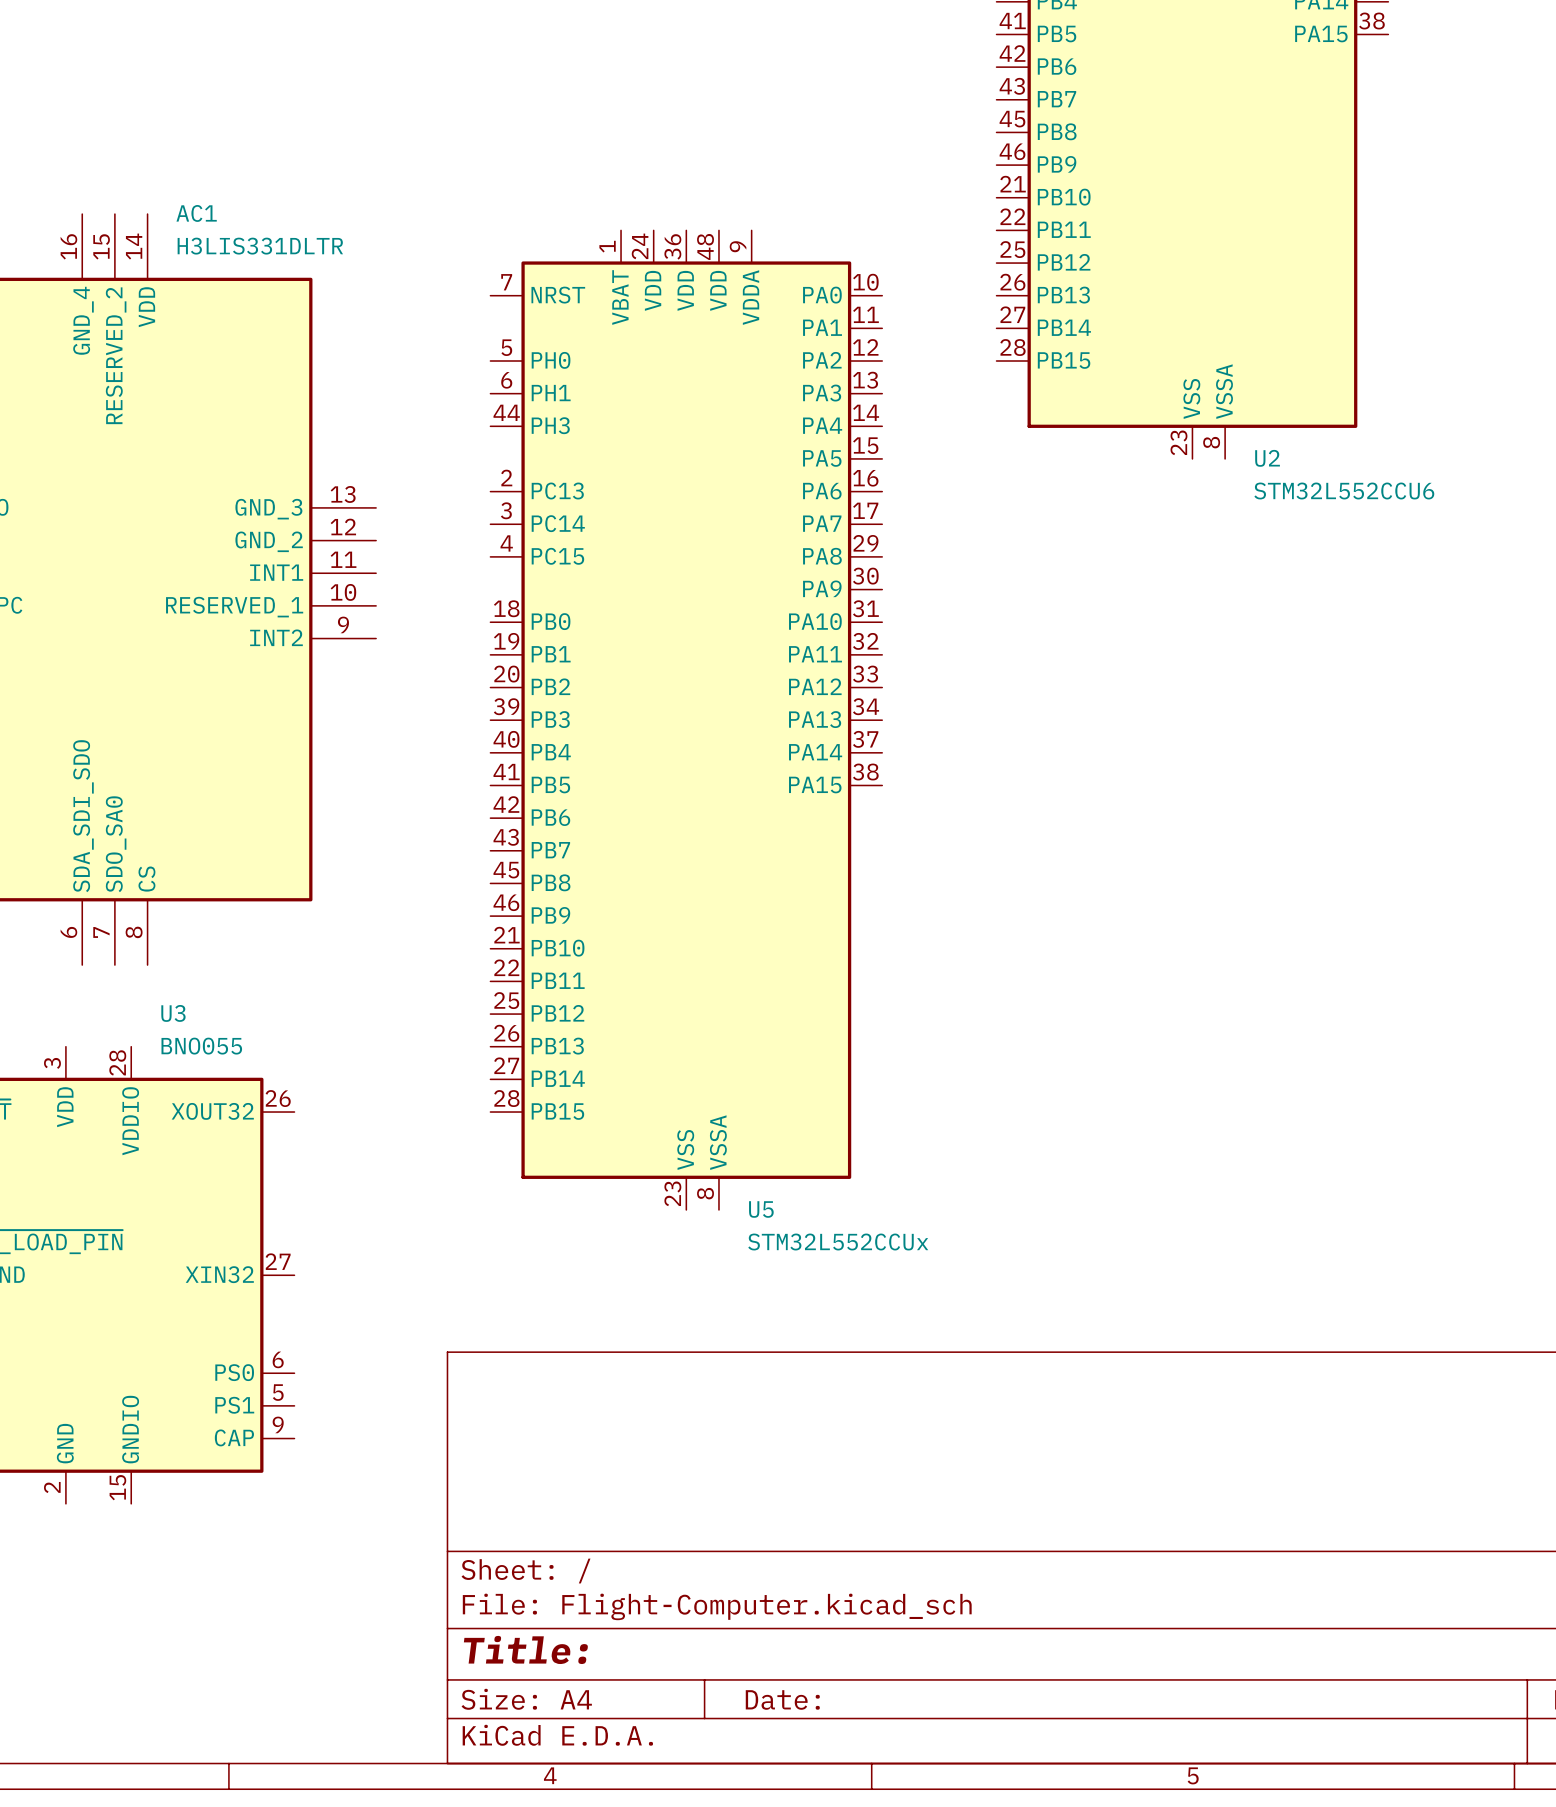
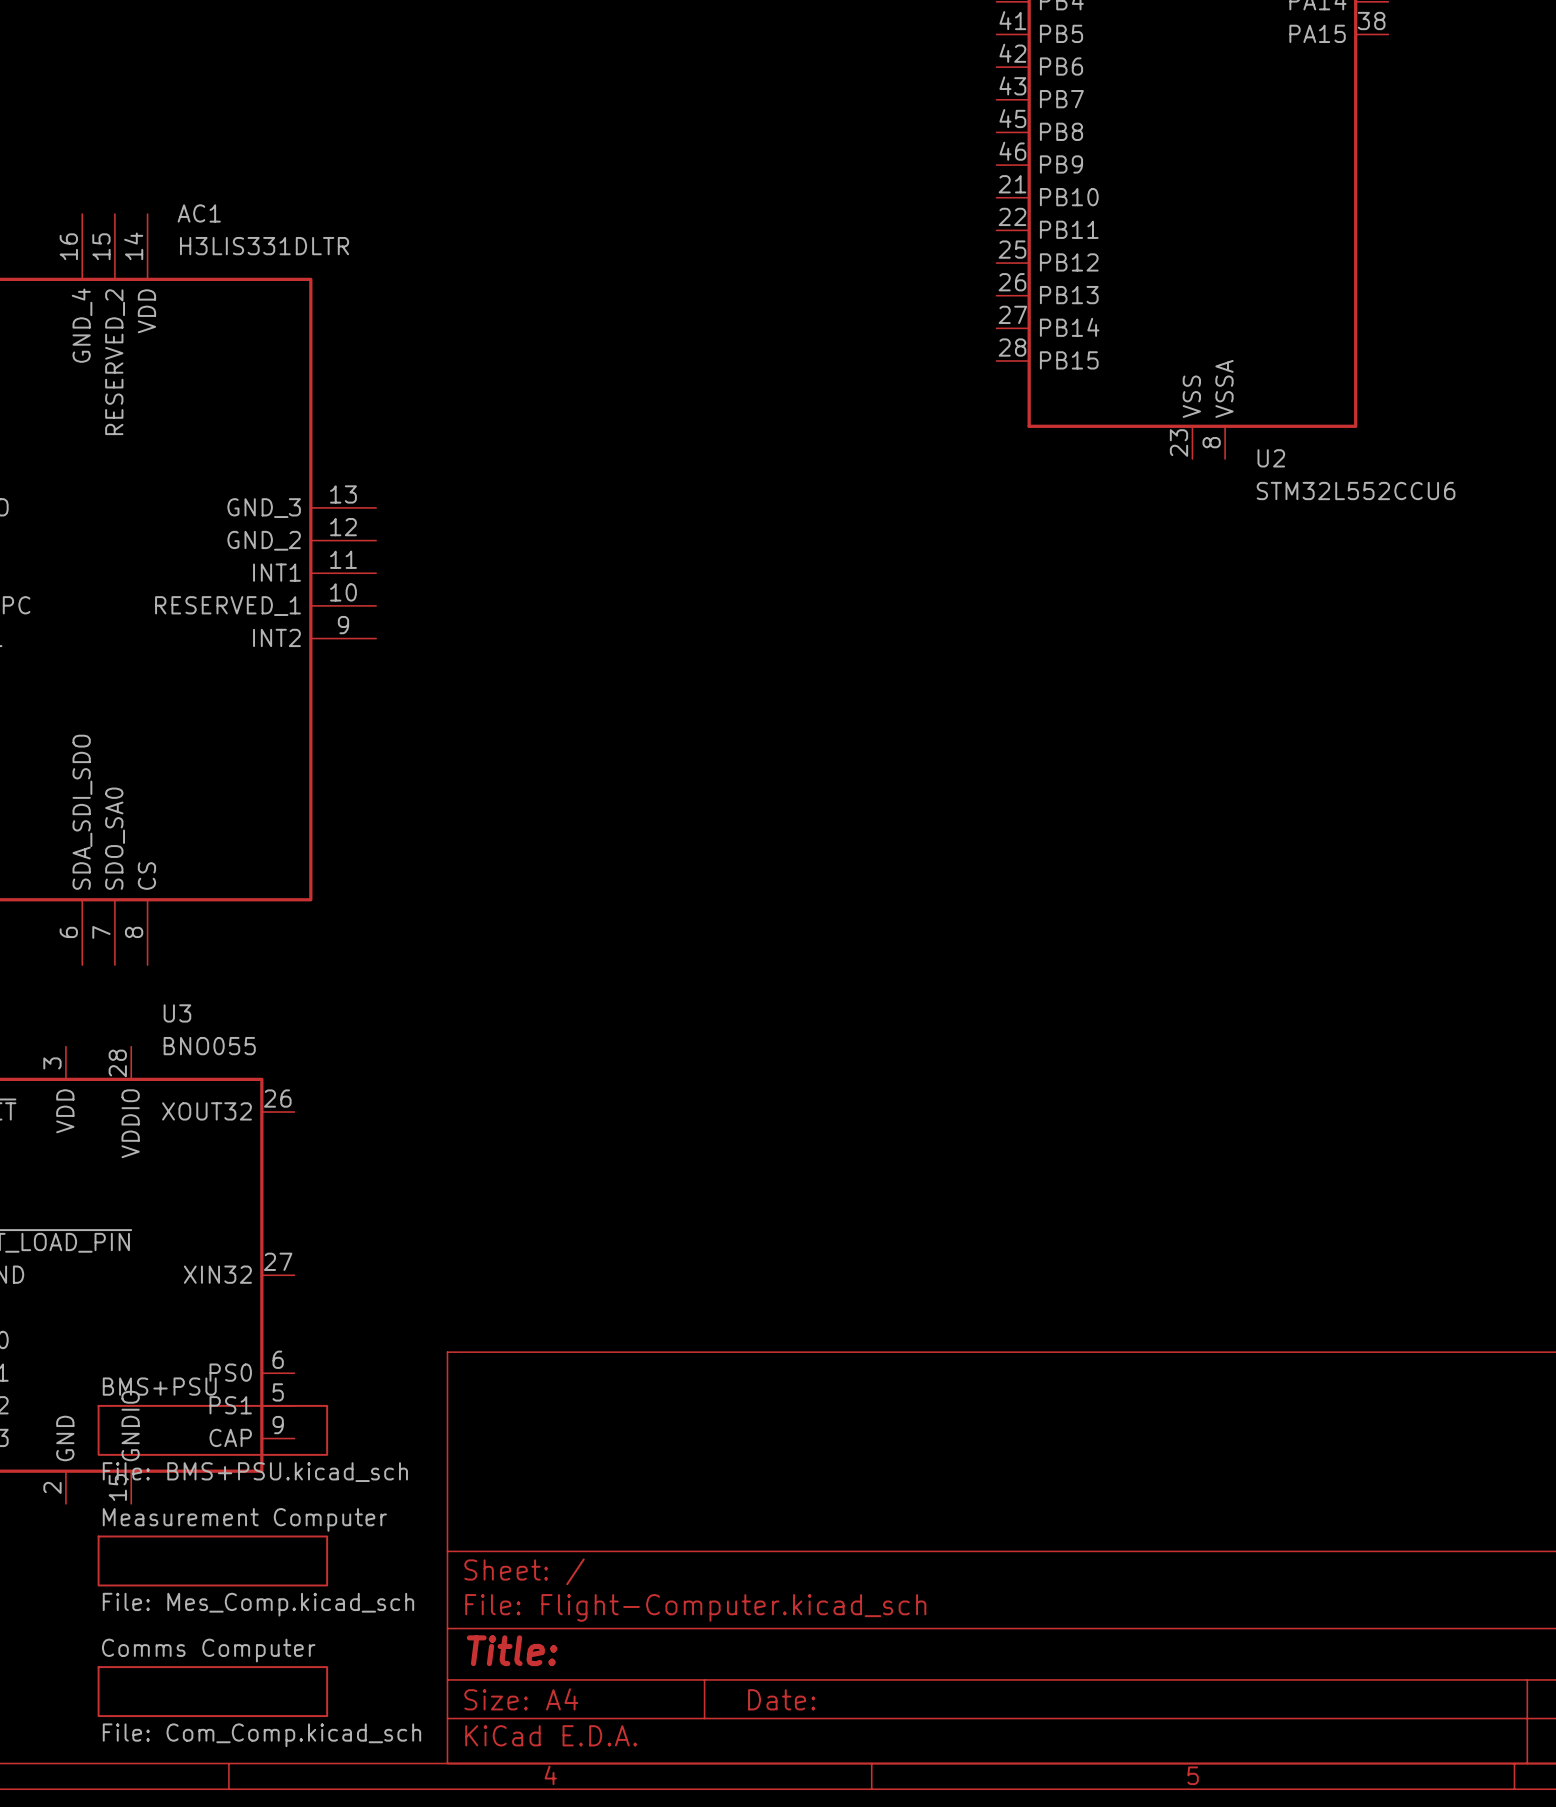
U5: STM32L552CCUx (686, 720) -> none
sheet BMS+PSU: none -> File: BMS+PSU.kicad_sch (212, 1430)
sheet Measurement Computer: none -> File: Mes_Comp.kicad_sch (212, 1560)
sheet Comms Computer: none -> File: Com_Comp.kicad_sch (212, 1691)

